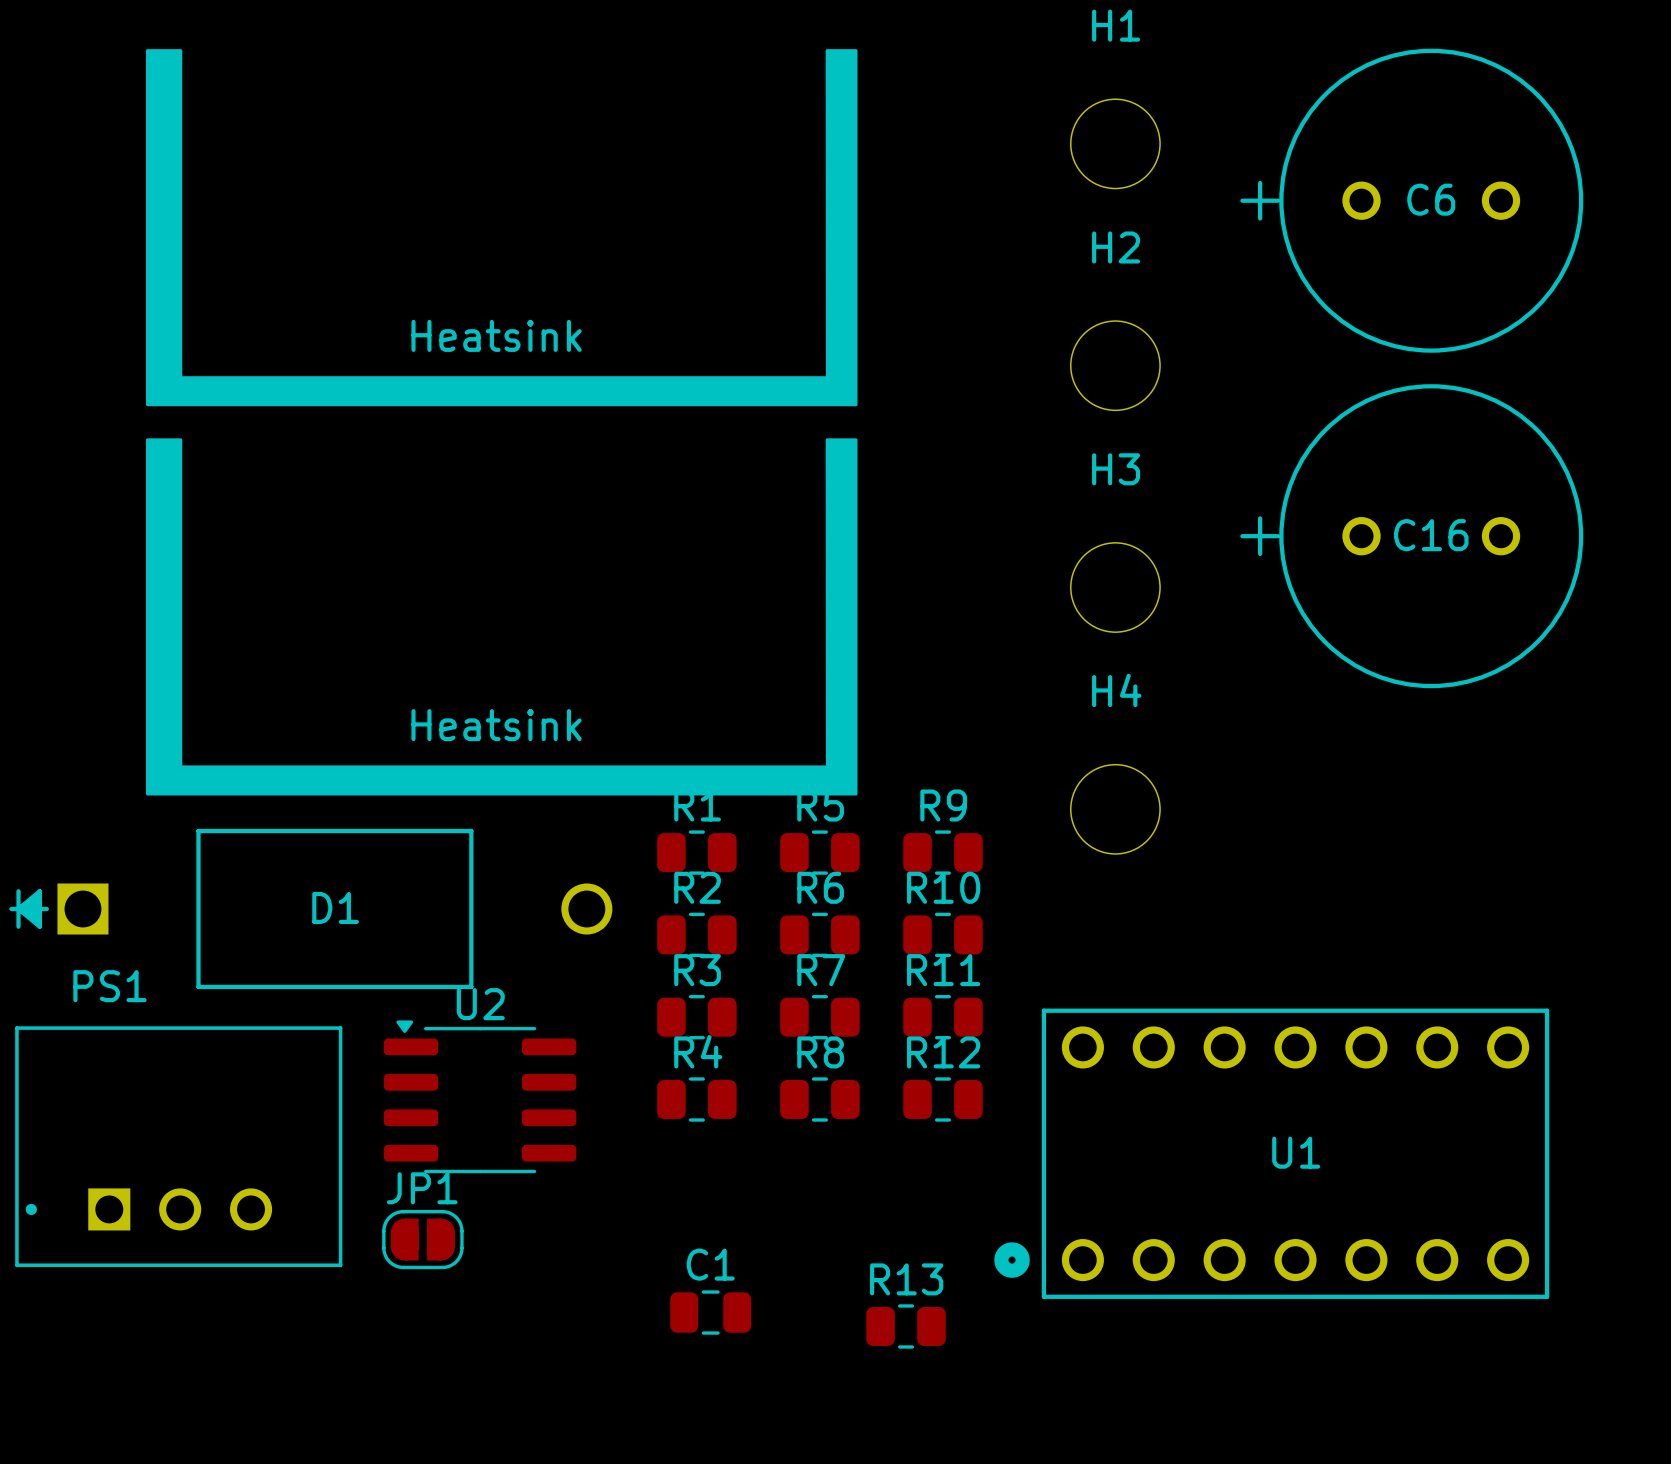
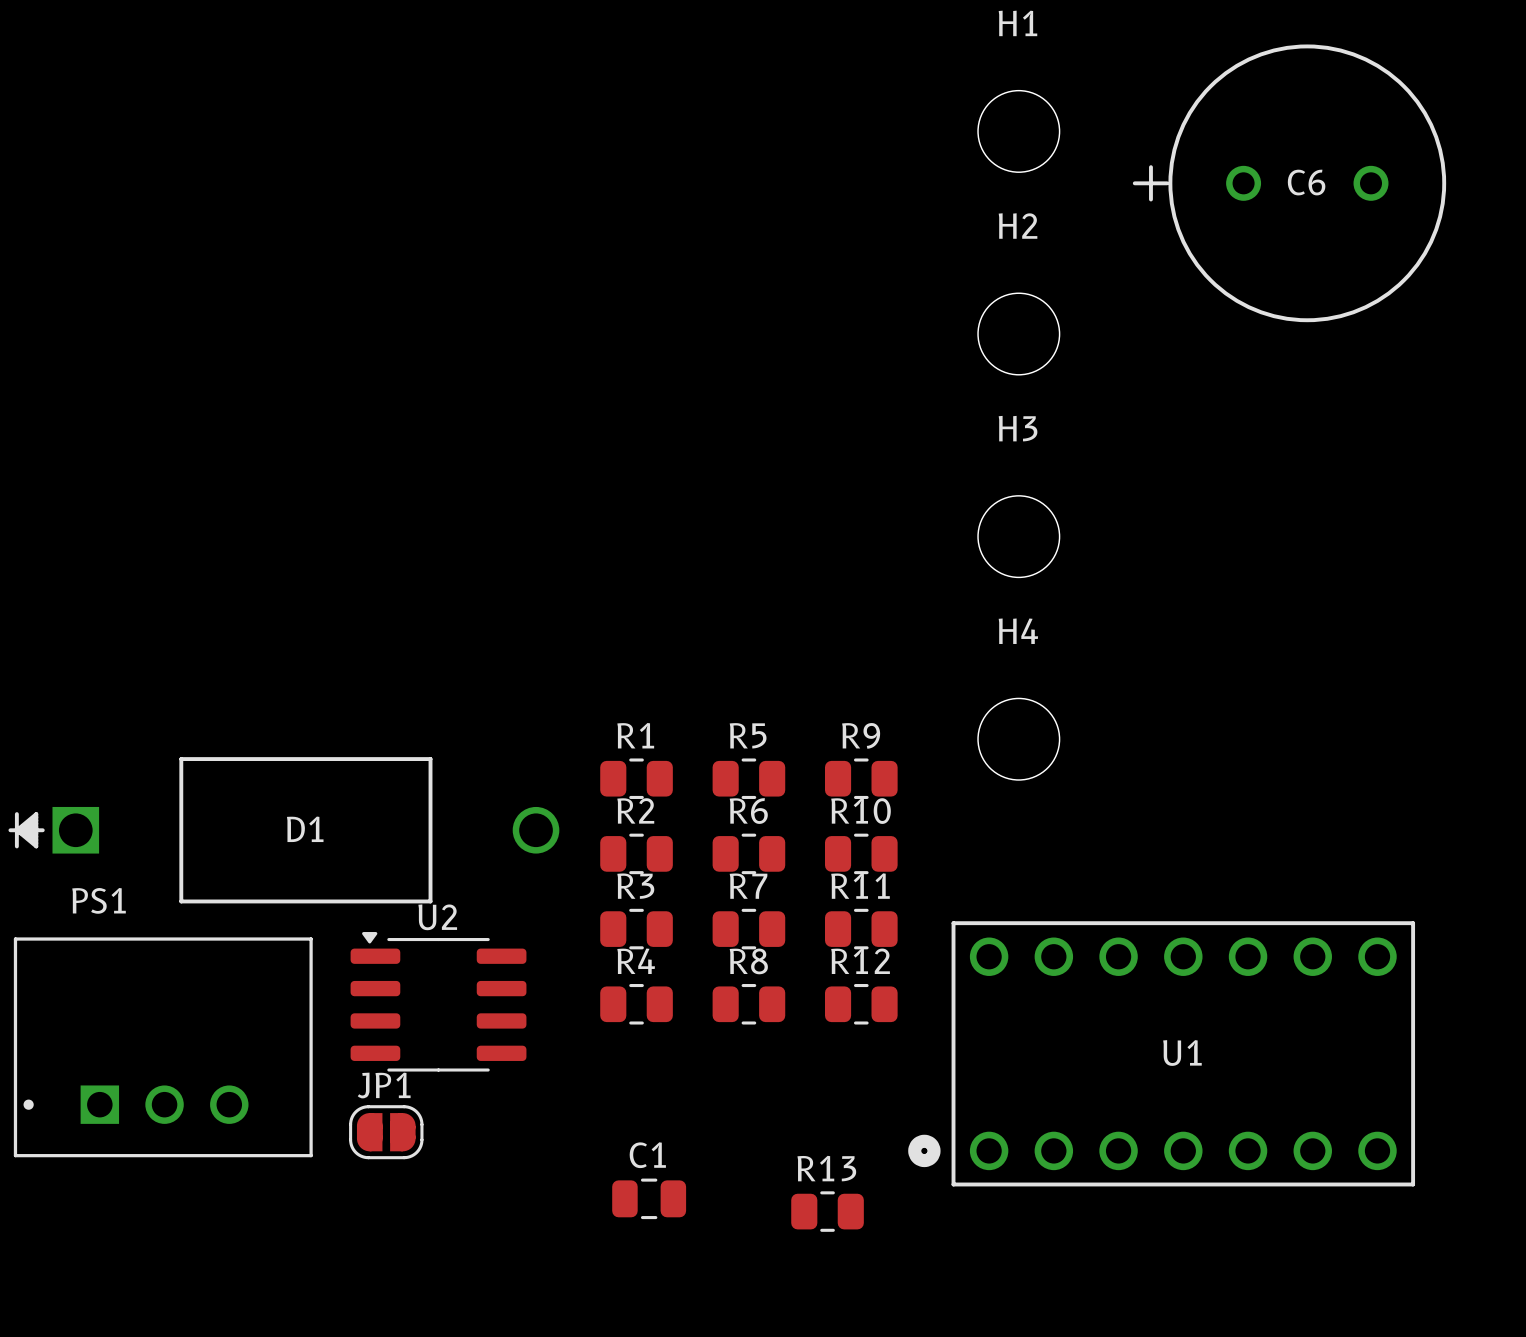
drawing: [146, 49, 858, 796] -> none
C16: (1411, 536) -> none

